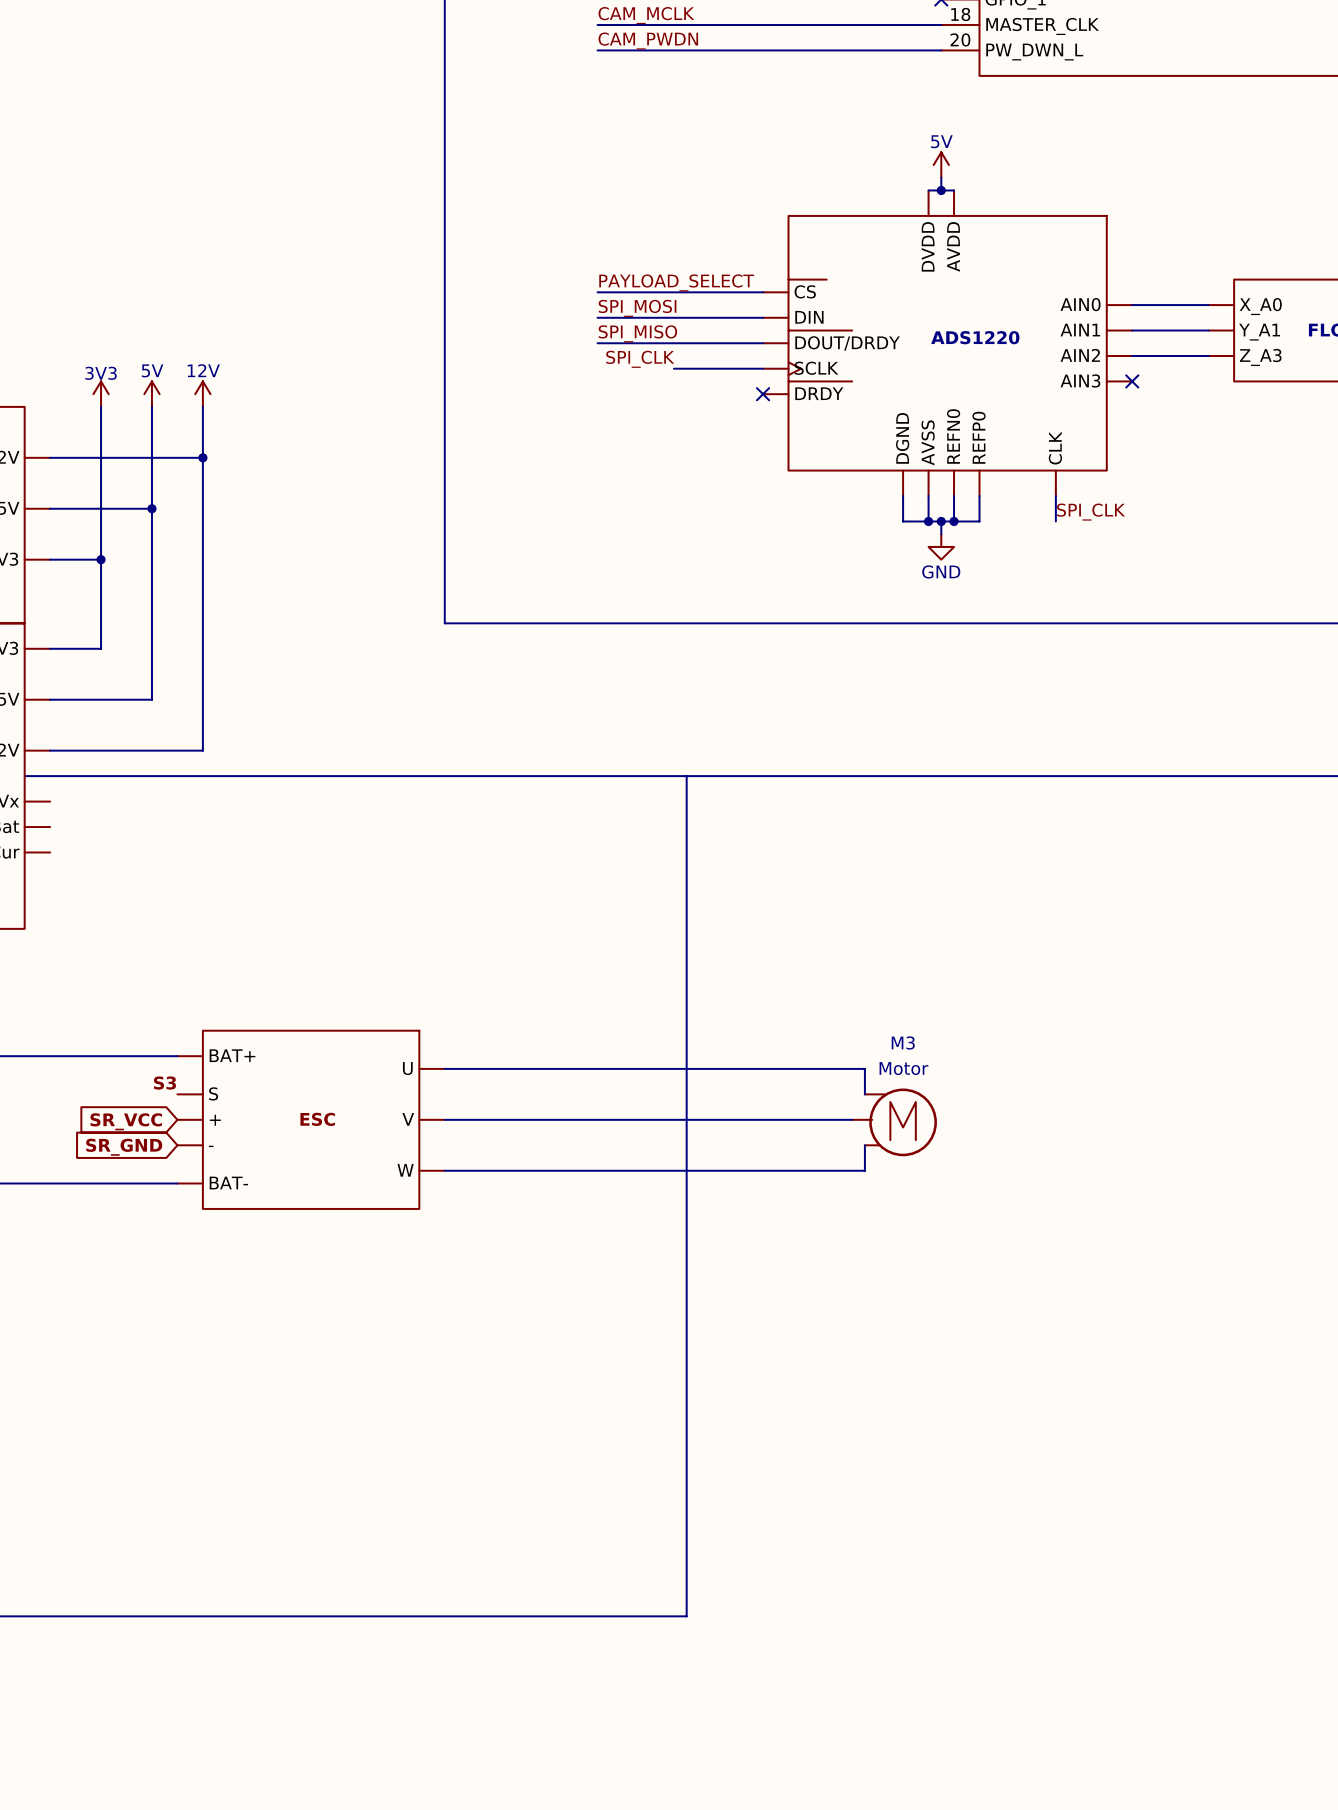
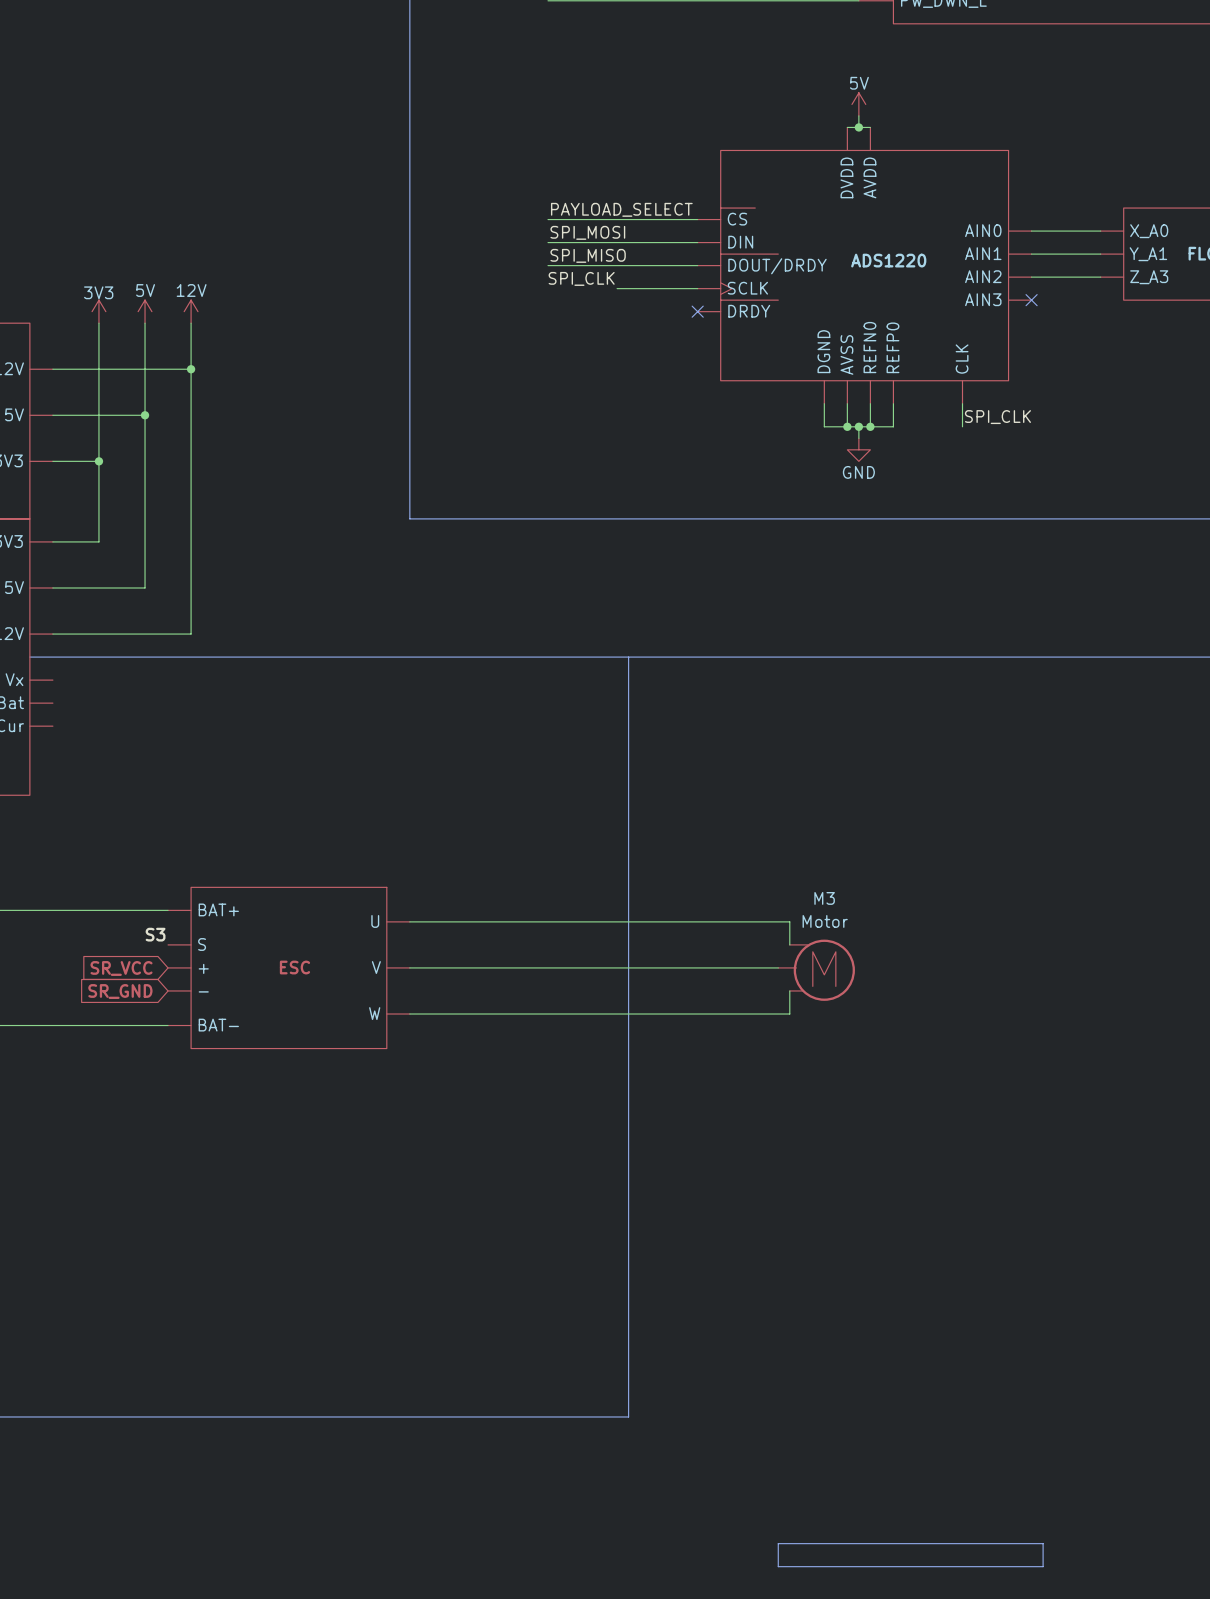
line: none -> (778, 1543) (1043, 1543) (1043, 1566) (778, 1566) (778, 1543)

